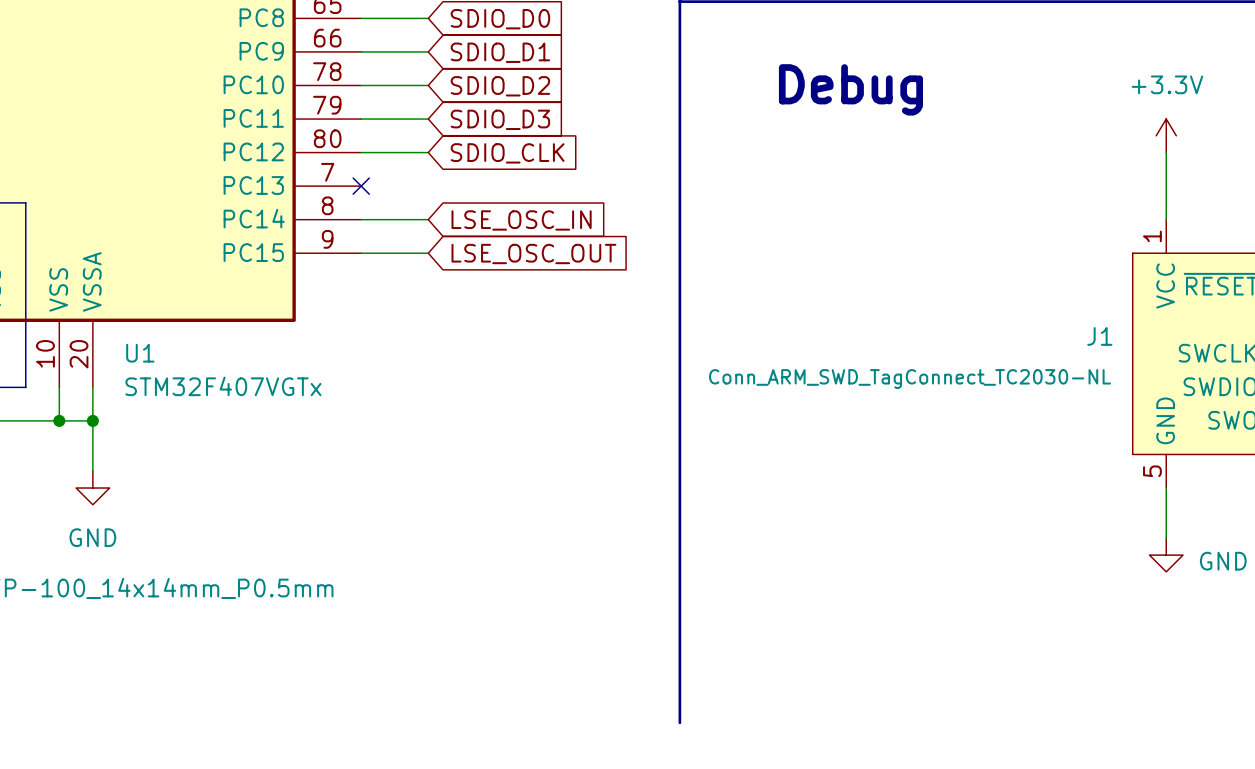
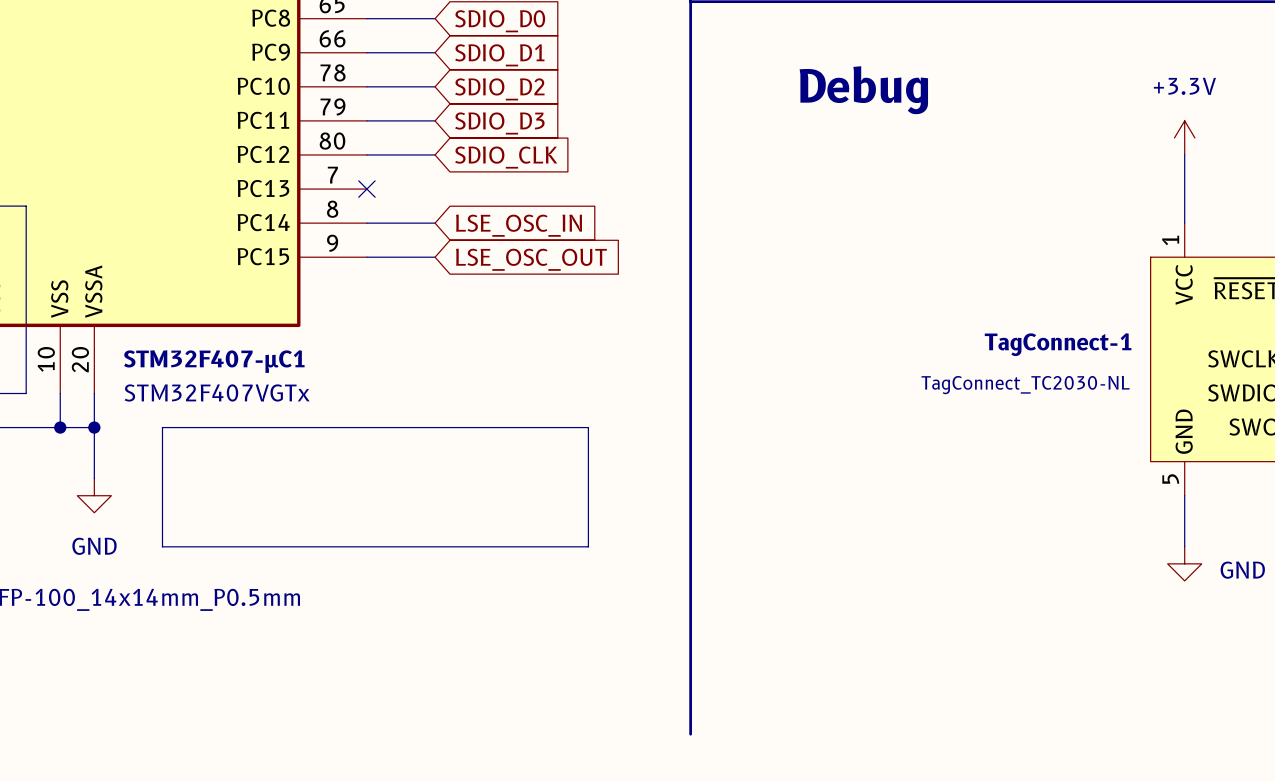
J1 name: J1 (1099, 336) -> TagConnect-1 (1058, 344)
U1 name: U1 (140, 353) -> STM32F407-µC1 (214, 361)
J1 value: Conn_ARM_SWD_TagConnect_TC2030-NL (910, 379) -> TagConnect_TC2030-NL (1025, 385)
line: none -> (162, 427) (588, 427) (588, 546) (162, 546) (162, 427)

